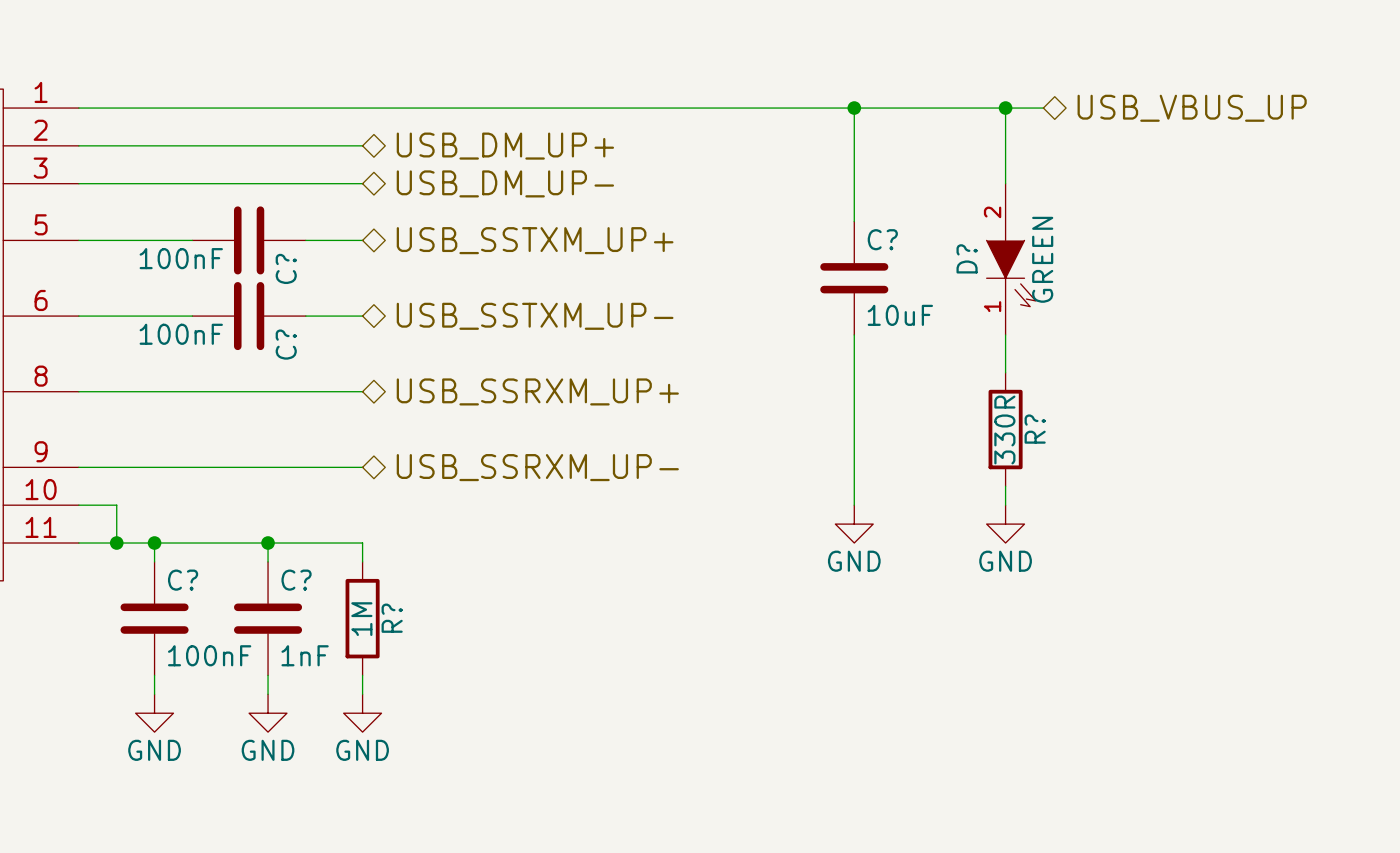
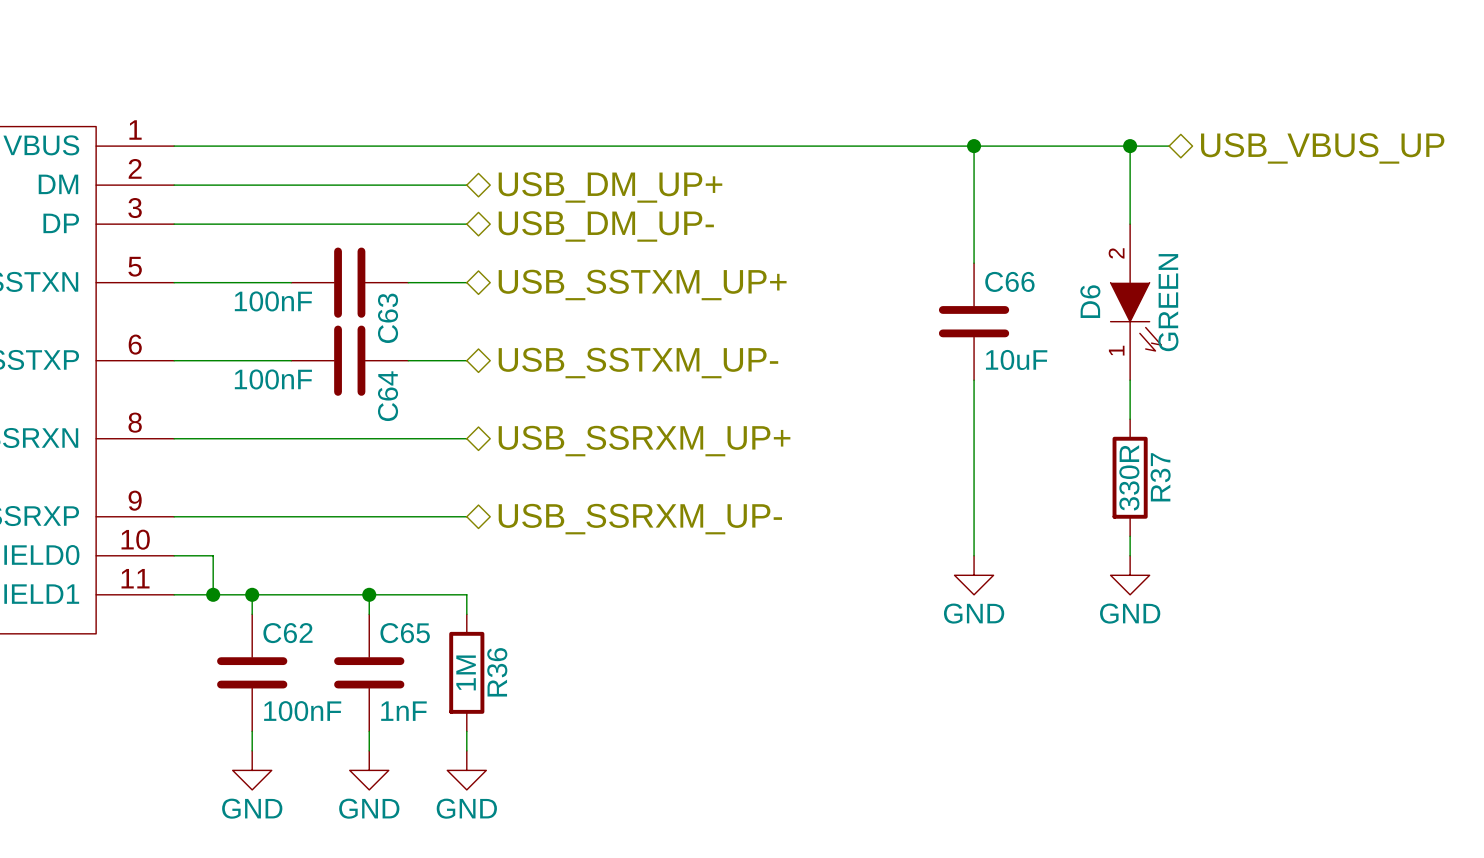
C? name: C? (882, 239) -> C66 (1009, 281)
D? name: D? (967, 258) -> D6 (1090, 301)
C? name: C? (286, 268) -> C63 (388, 318)
C? name: C? (286, 344) -> C64 (388, 396)
R? name: R? (1035, 429) -> R37 (1160, 477)
C? name: C? (183, 580) -> C62 (287, 633)
C? name: C? (296, 580) -> C65 (405, 633)
R? name: R? (392, 618) -> R36 (497, 672)

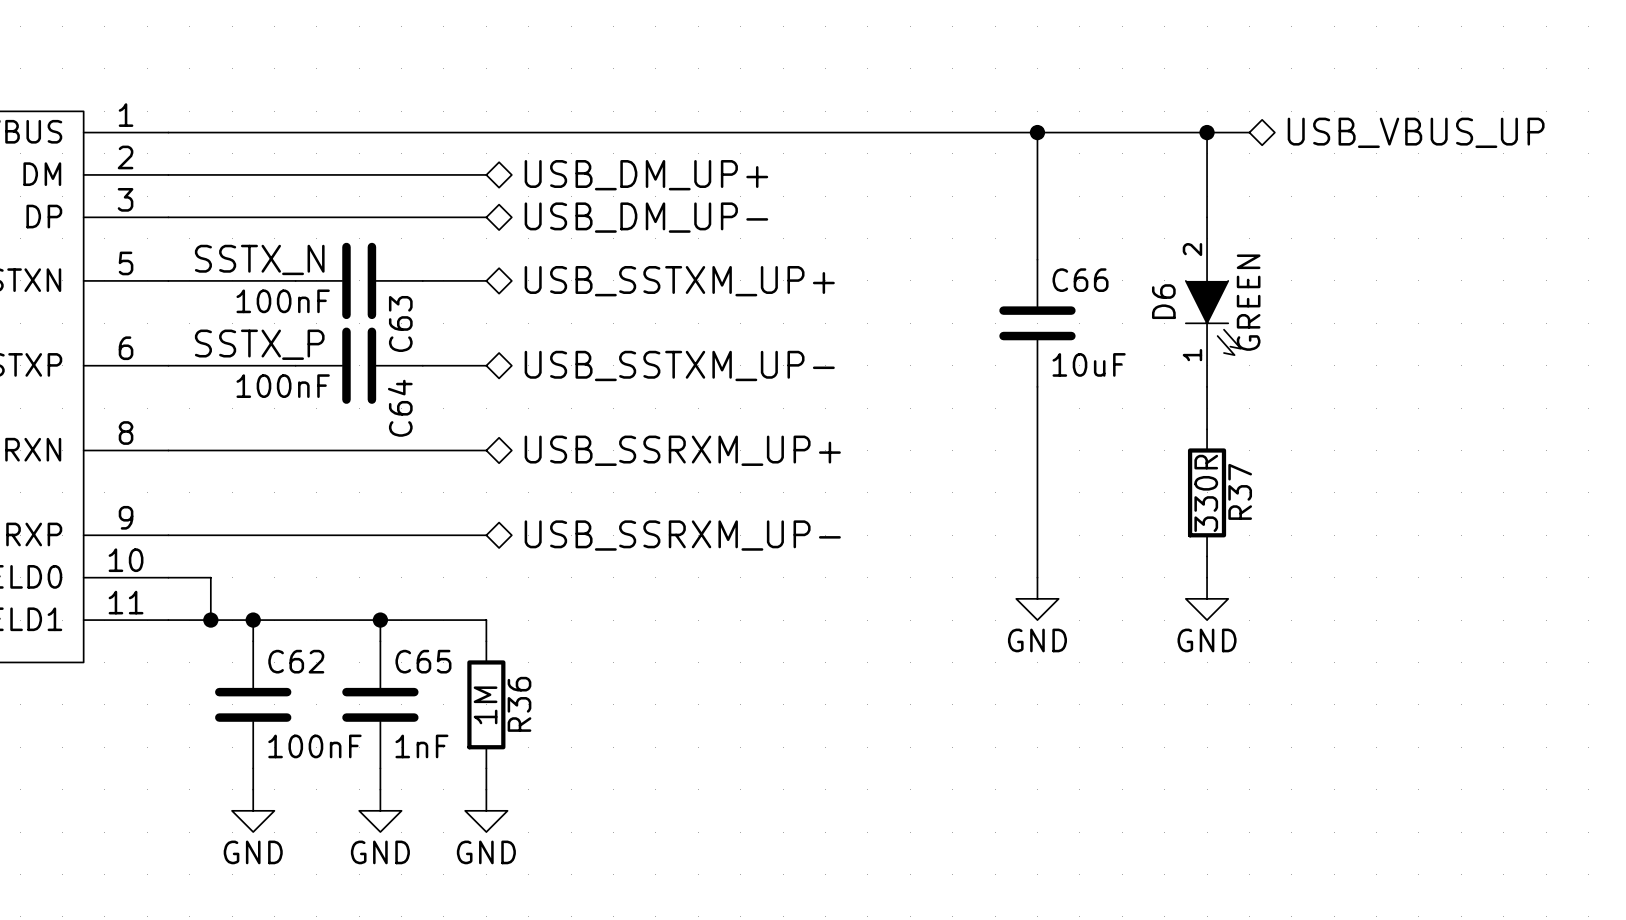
label: none -> SSTX_N (259, 259)
label: none -> SSTX_P (259, 344)

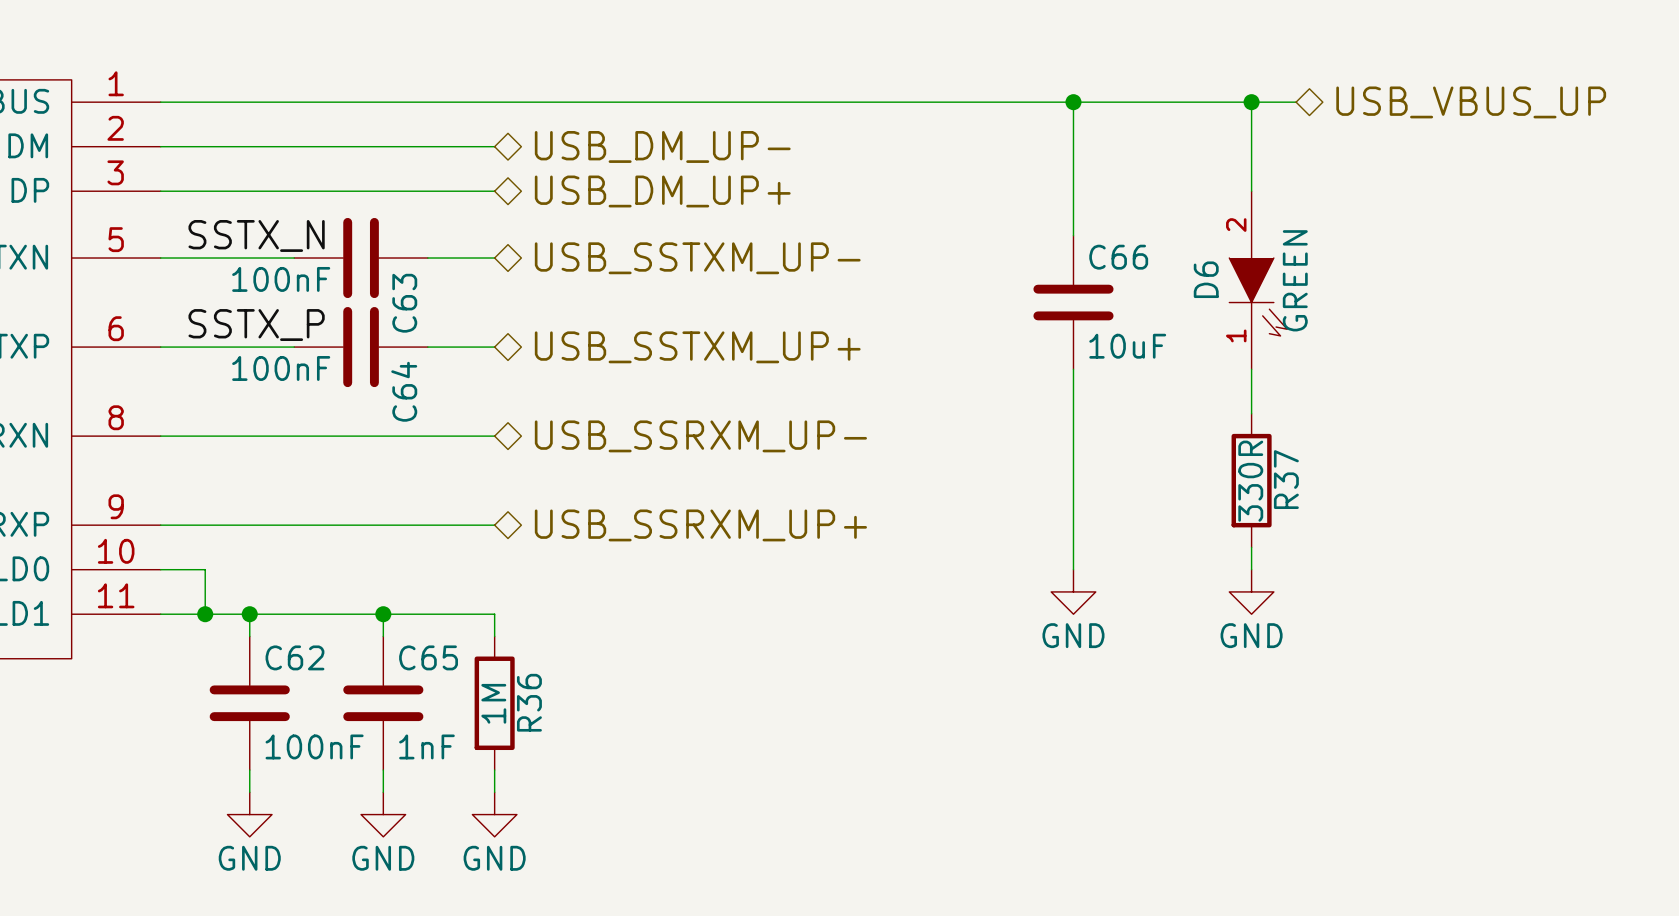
hierarchical label: USB_DM_UP+ (646, 175) -> USB_DM_UP- (662, 146)
hierarchical label: USB_DM_UP- (646, 217) -> USB_DM_UP+ (662, 191)
hierarchical label: USB_SSTXM_UP+ (679, 281) -> USB_SSTXM_UP- (697, 258)
hierarchical label: USB_SSTXM_UP- (679, 365) -> USB_SSTXM_UP+ (697, 347)
hierarchical label: USB_SSRXM_UP+ (682, 450) -> USB_SSRXM_UP- (700, 436)
hierarchical label: USB_SSRXM_UP- (682, 535) -> USB_SSRXM_UP+ (700, 525)

